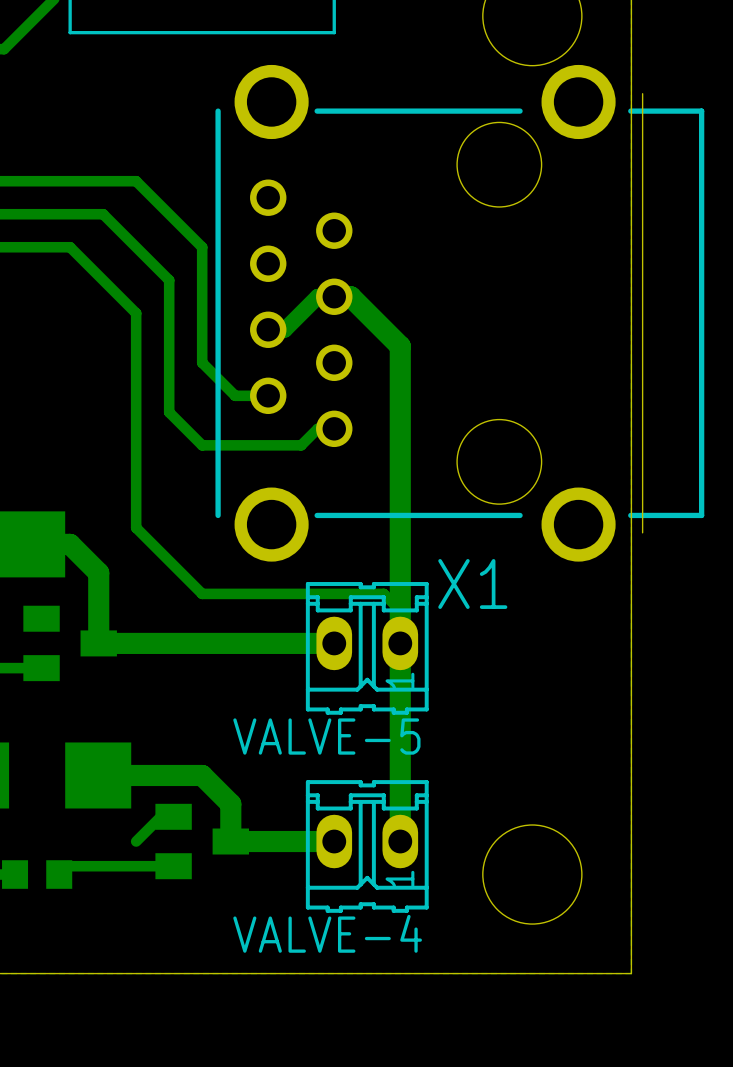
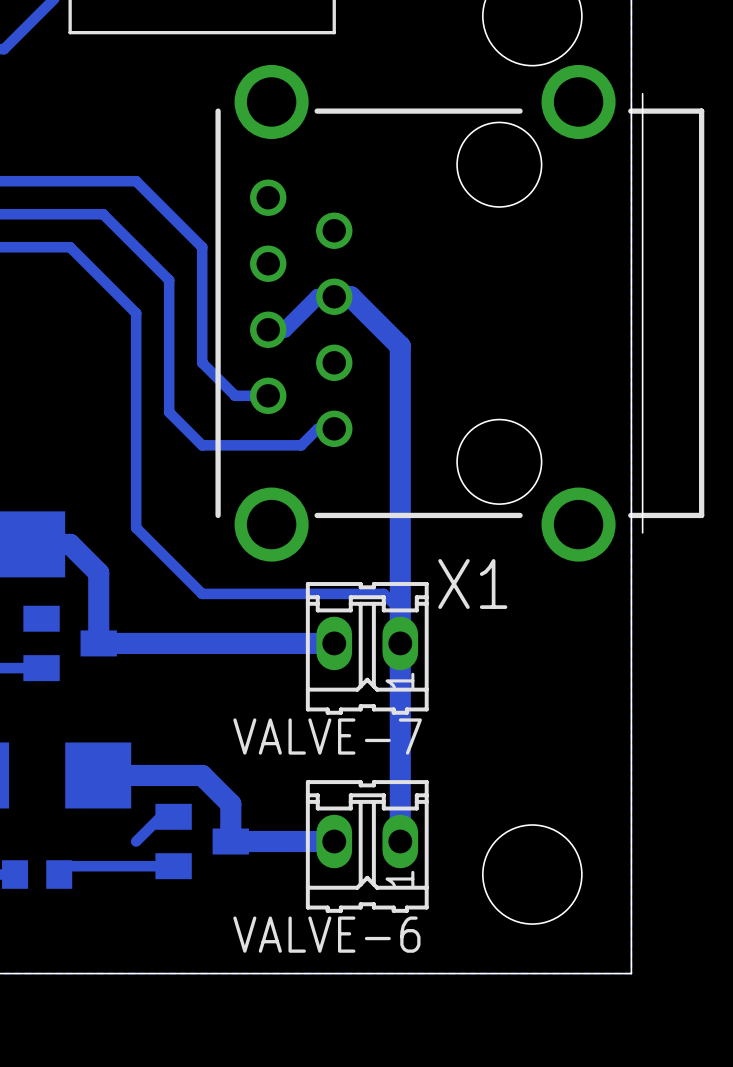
VALVE-5 name: VALVE-5 (326, 736) -> VALVE-7 (327, 736)
VALVE-4 name: VALVE-4 (327, 933) -> VALVE-6 (326, 934)

